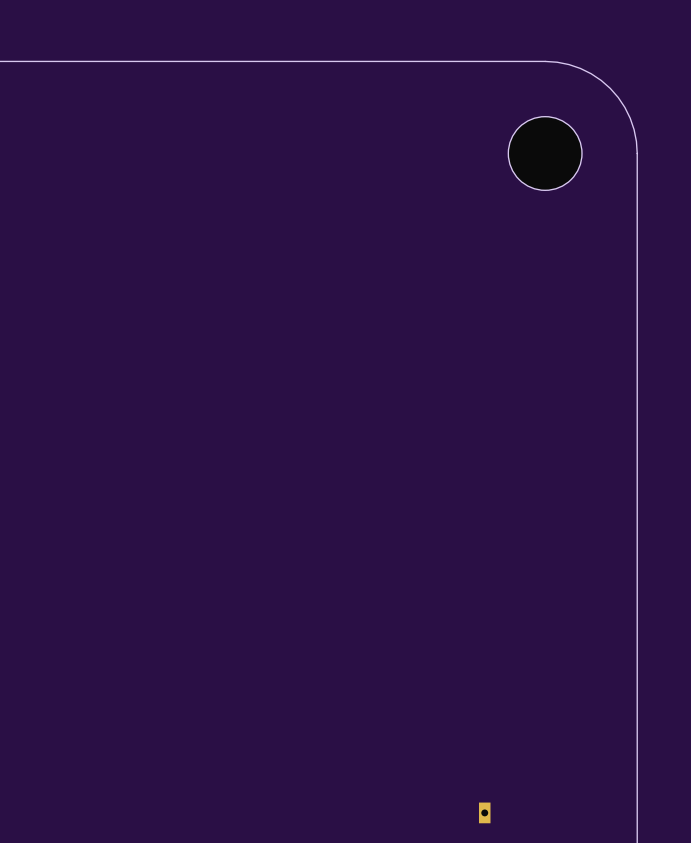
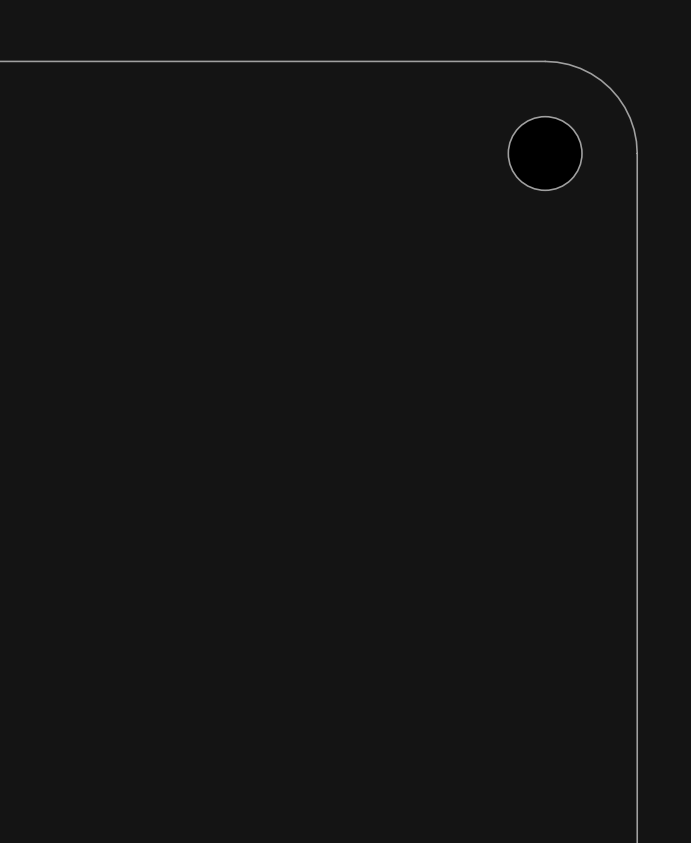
part: (484, 812) -> none

